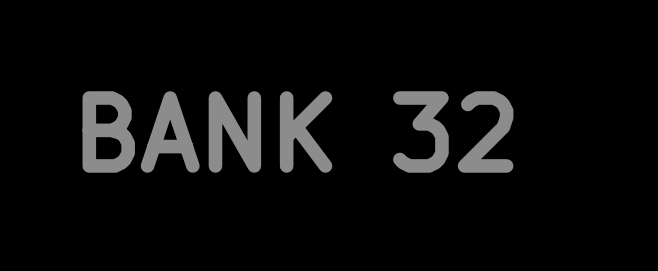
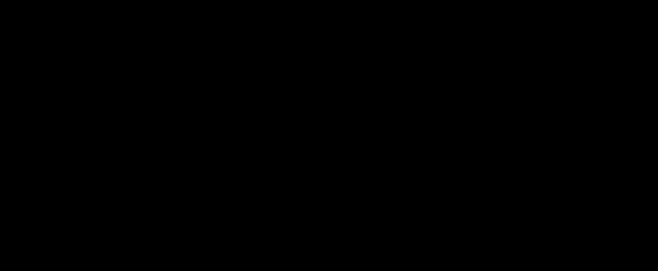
text: BANK 32 (297, 131) -> none

